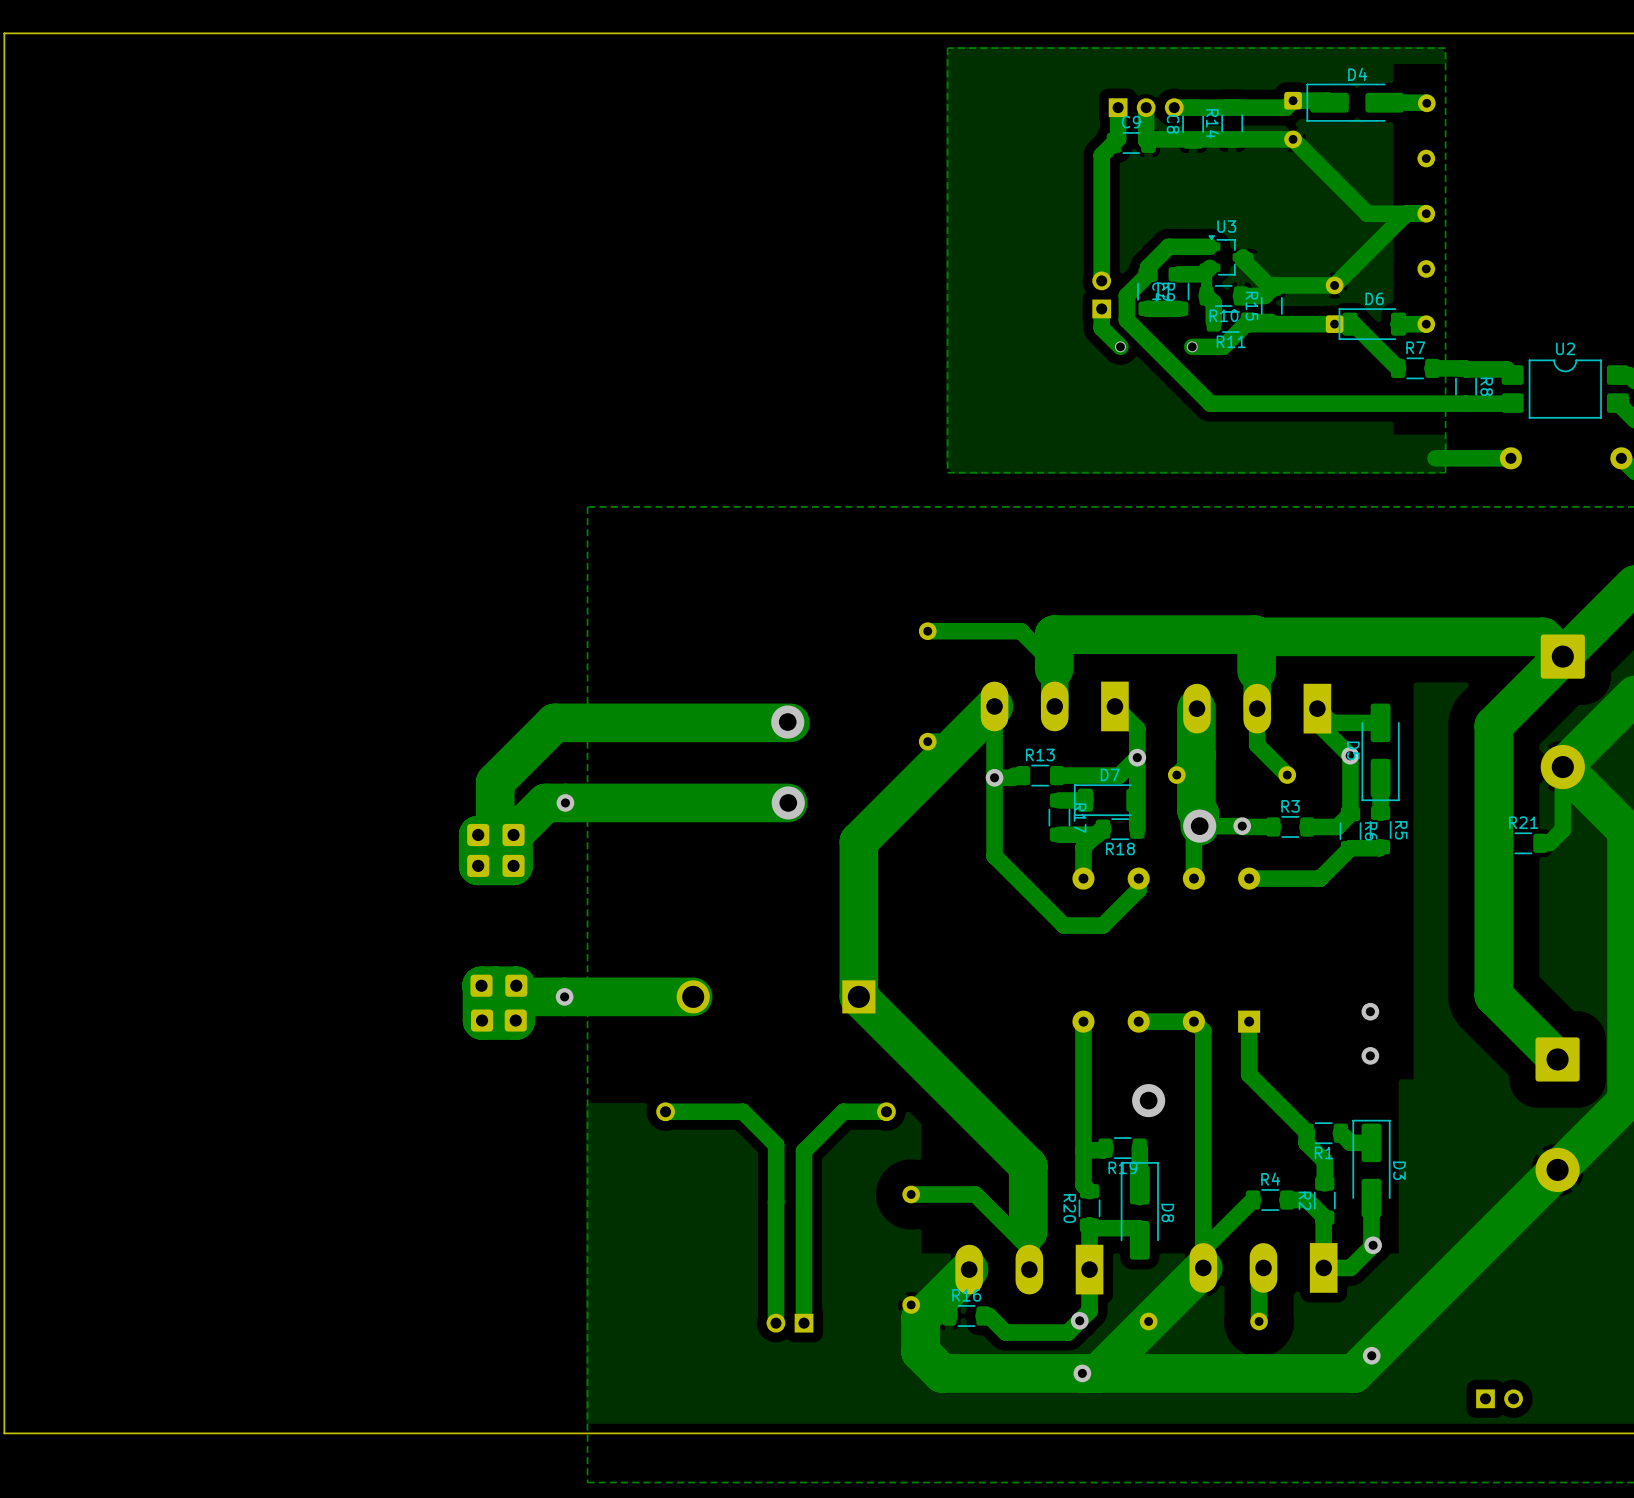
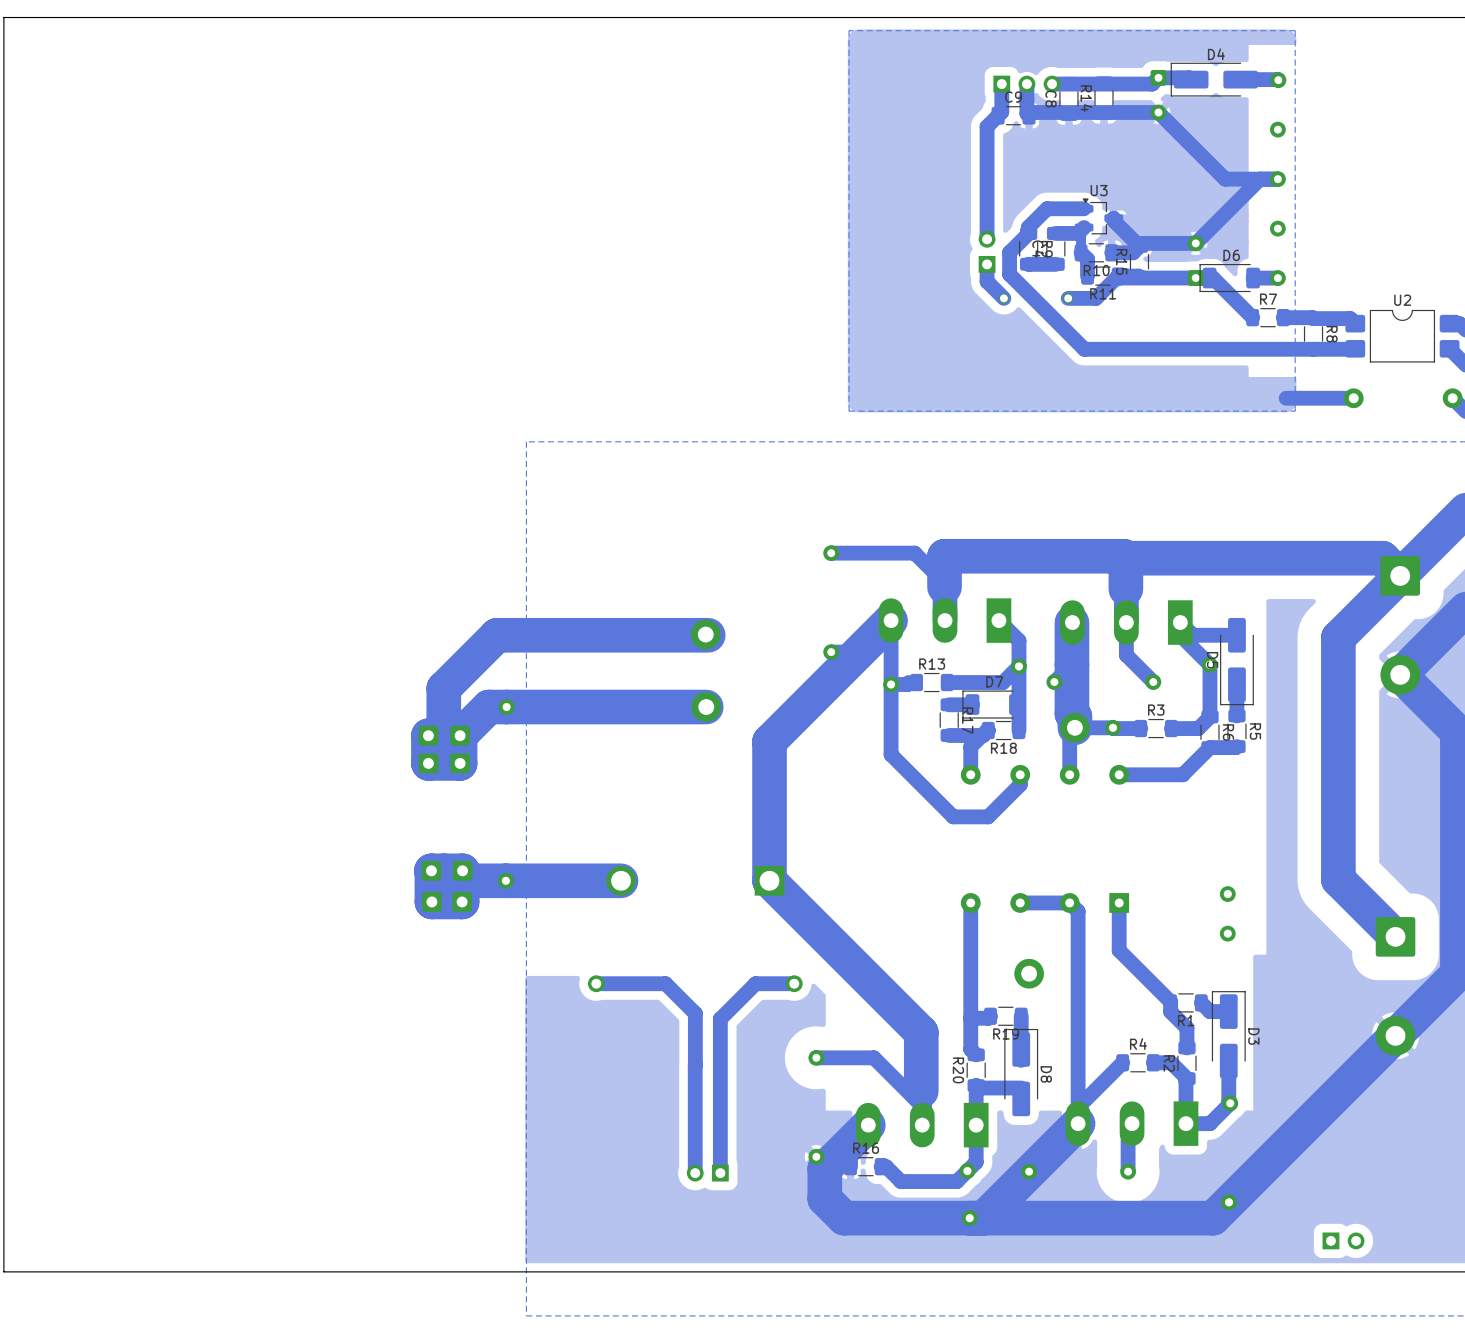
track: (1562, 767) (1562, 829) (1549, 843) -> none
R21: (1523, 843) -> none

